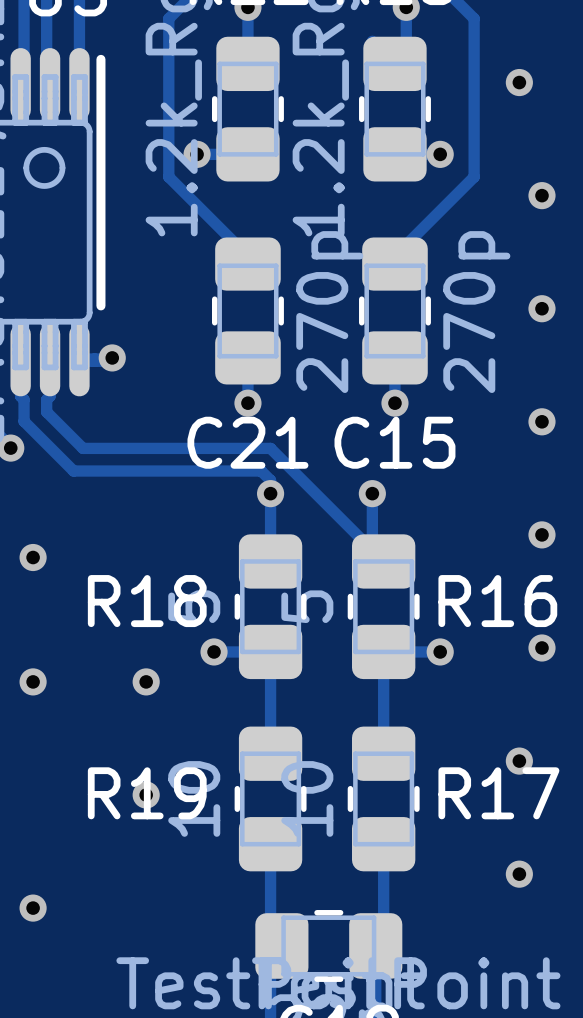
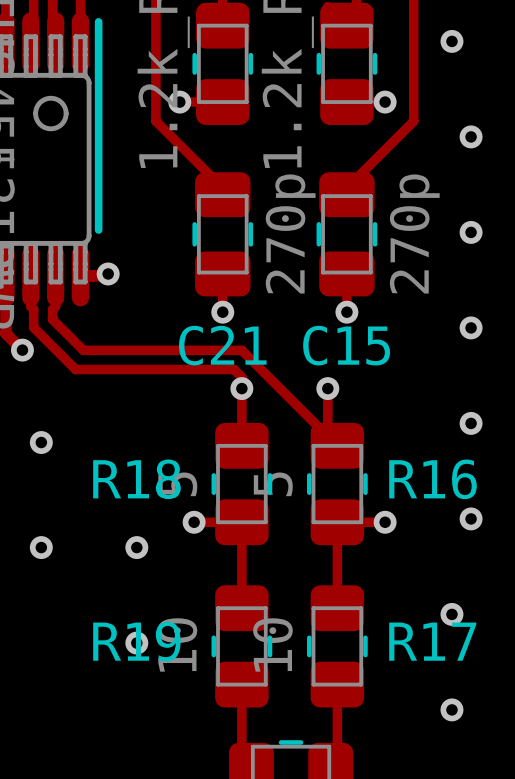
via: (33, 908) -> none

